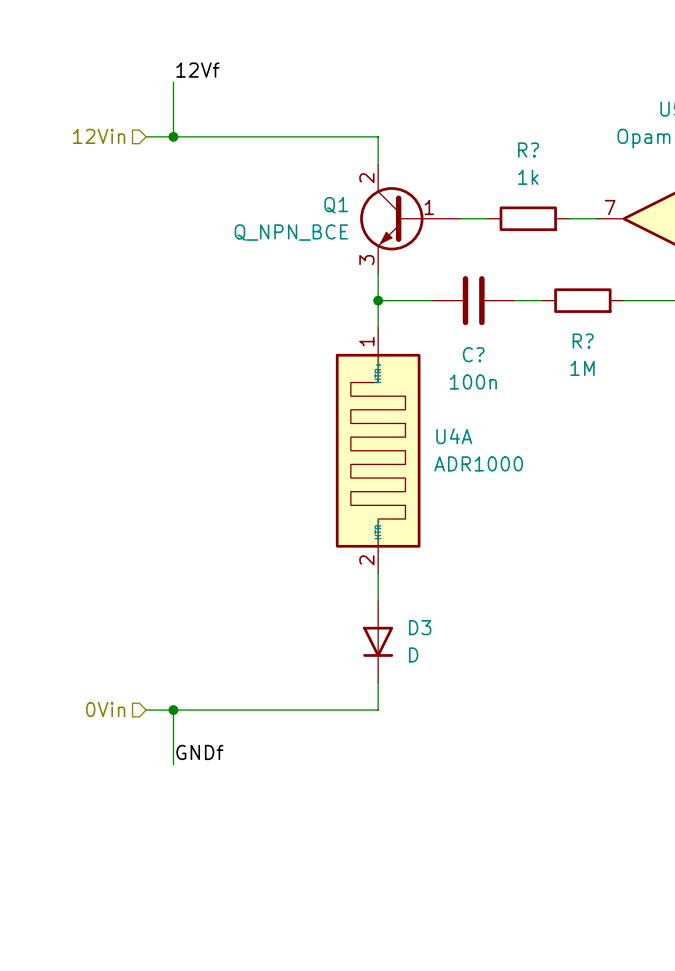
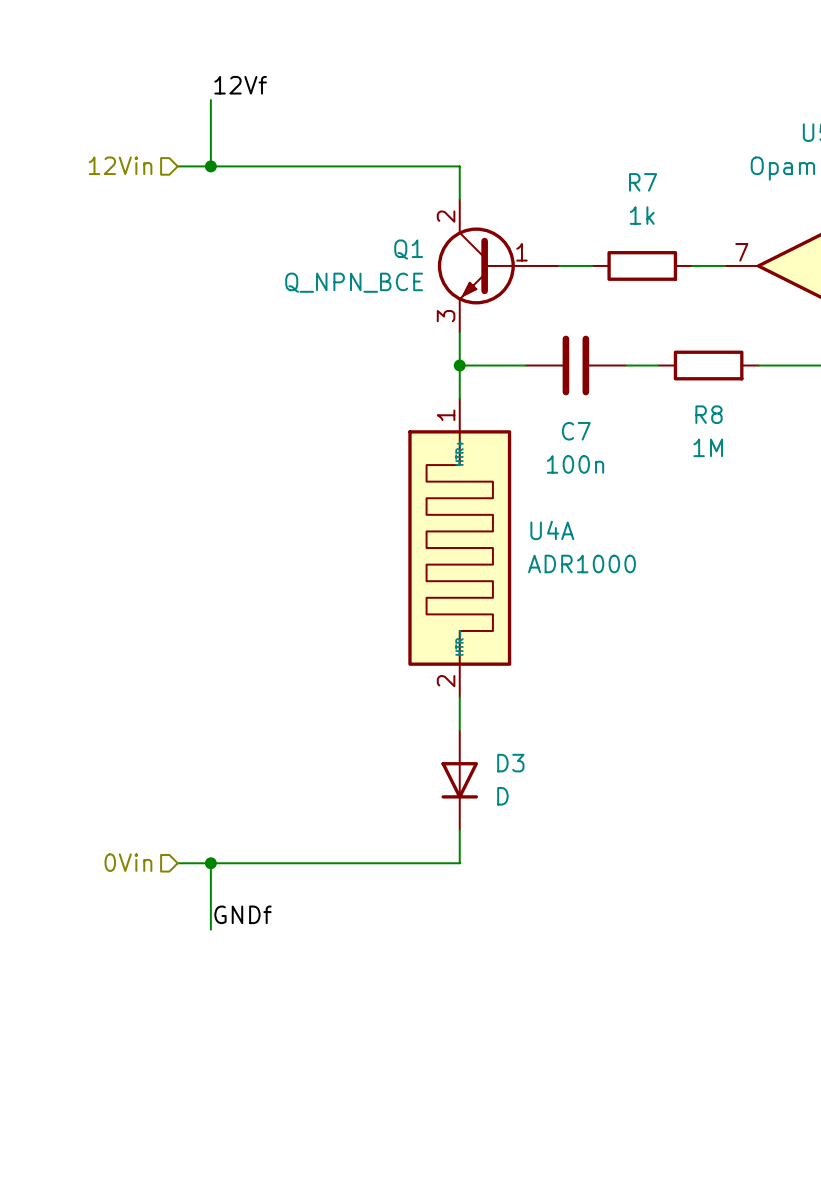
R? name: R? (528, 150) -> R7 (643, 182)
R? name: R? (583, 341) -> R8 (709, 414)
C? name: C? (473, 354) -> C7 (576, 431)

